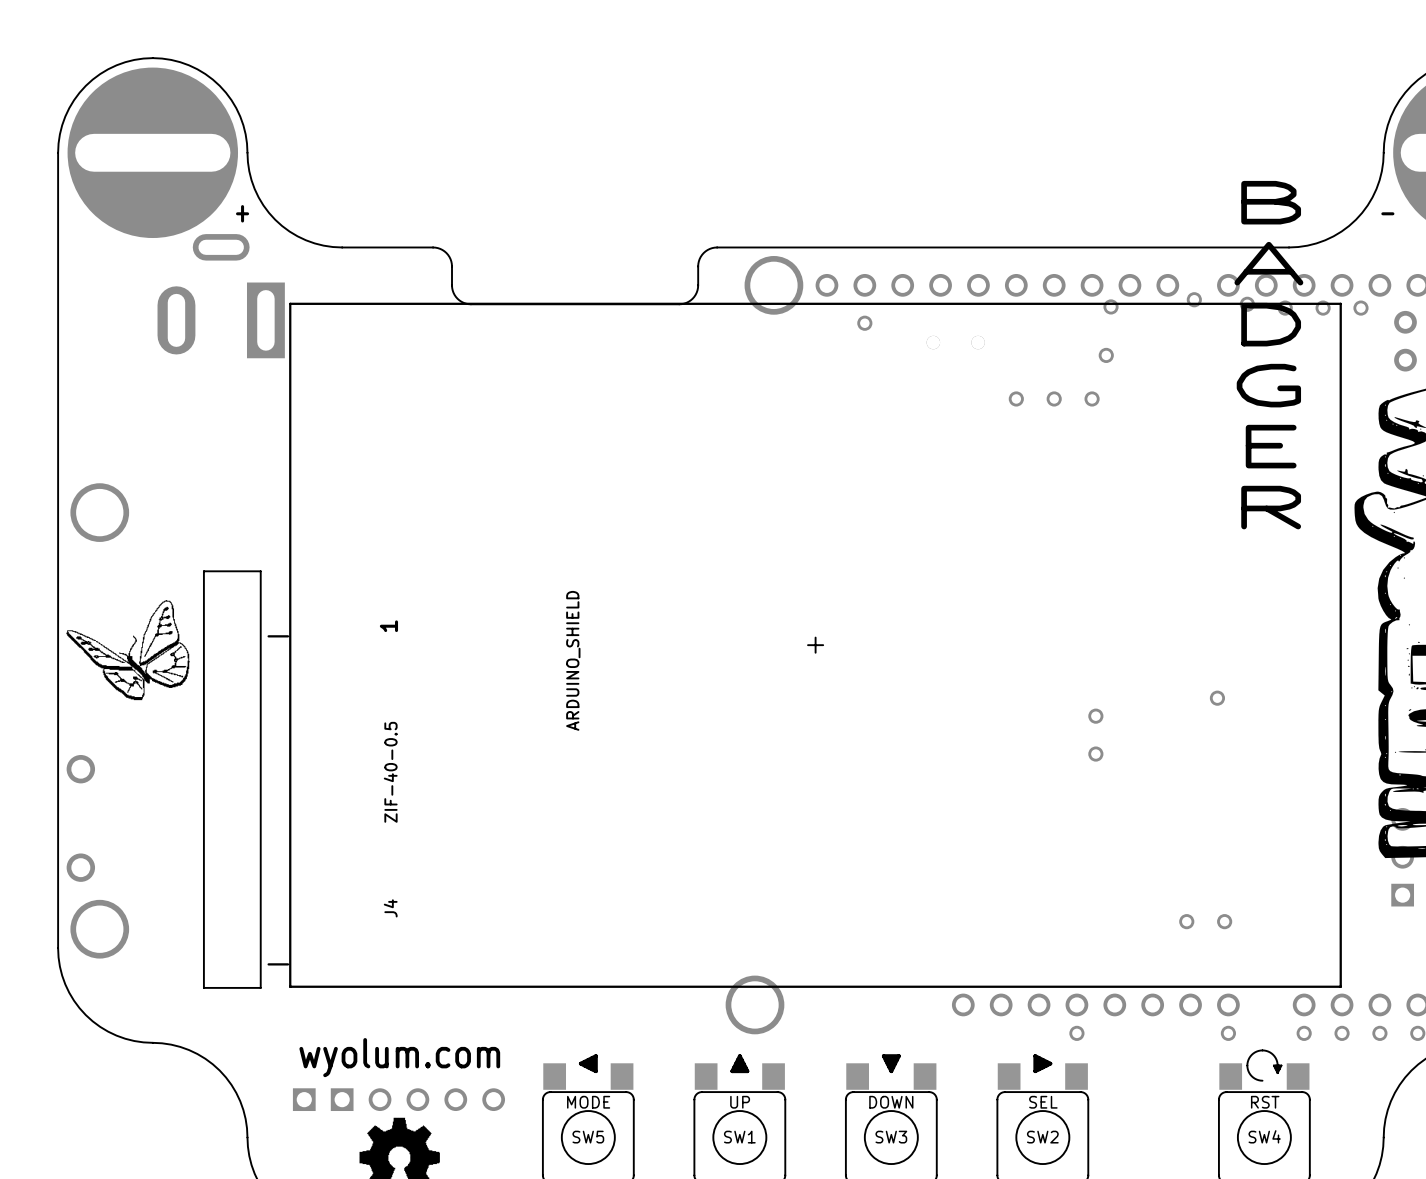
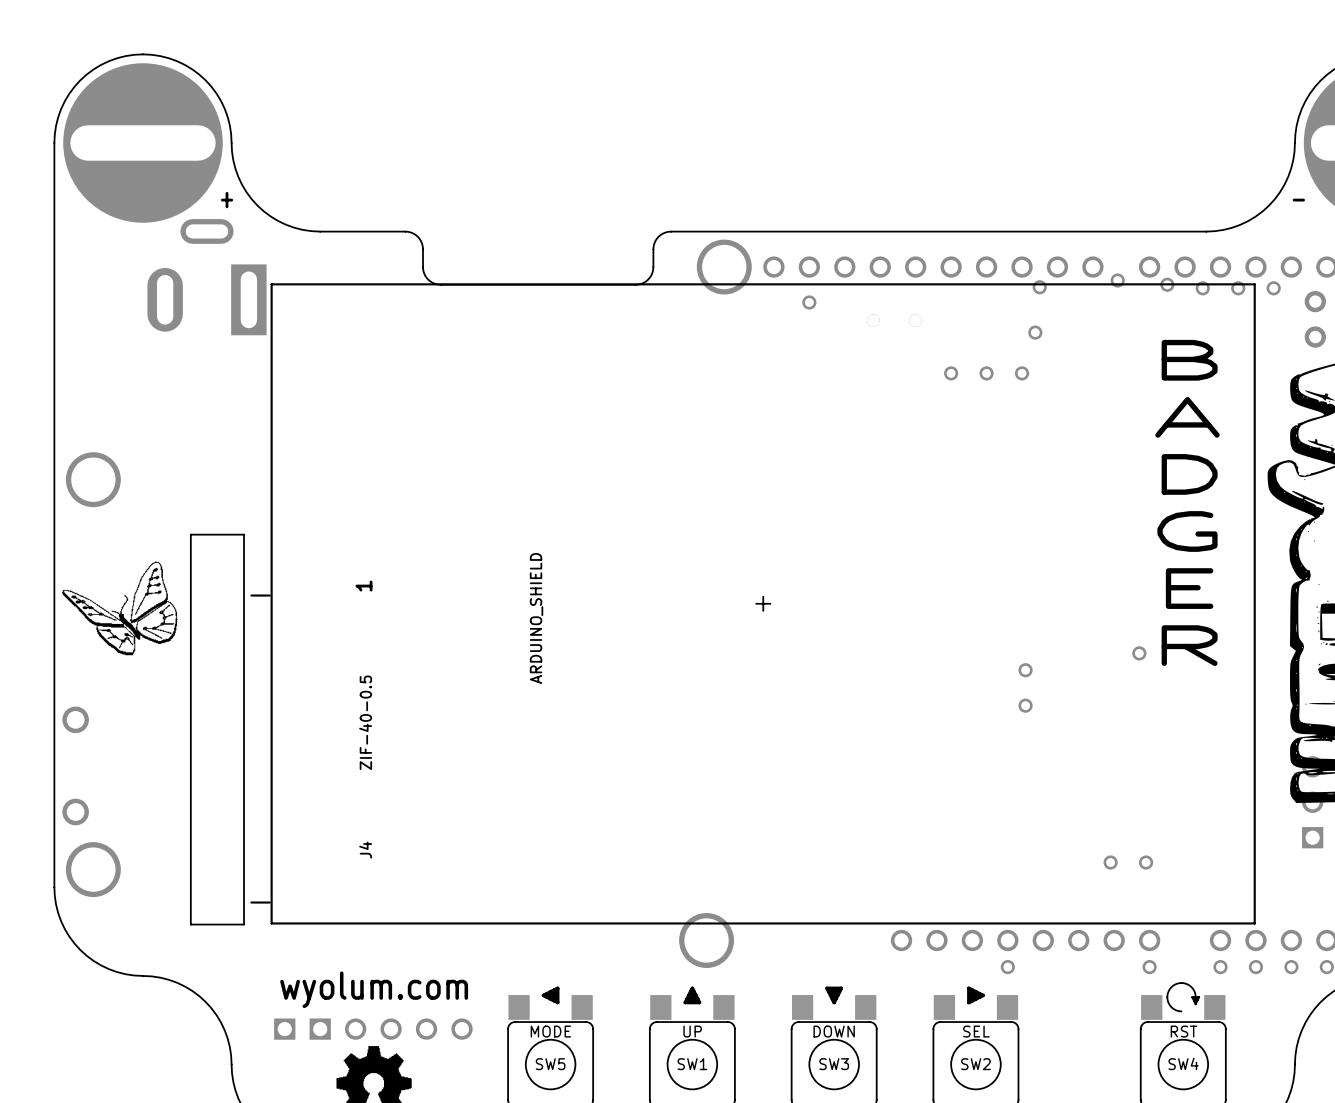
text: B (1271, 202) -> none
text: A (1268, 263) -> none
text: D (1271, 324) -> none
text: G (1268, 385) -> B (1189, 360)
text: E (1271, 446) -> A (1187, 417)
text: R (1271, 507) -> D (1189, 474)
text: none -> G (1187, 531)
text: none -> E (1189, 588)
text: none -> R (1189, 645)

